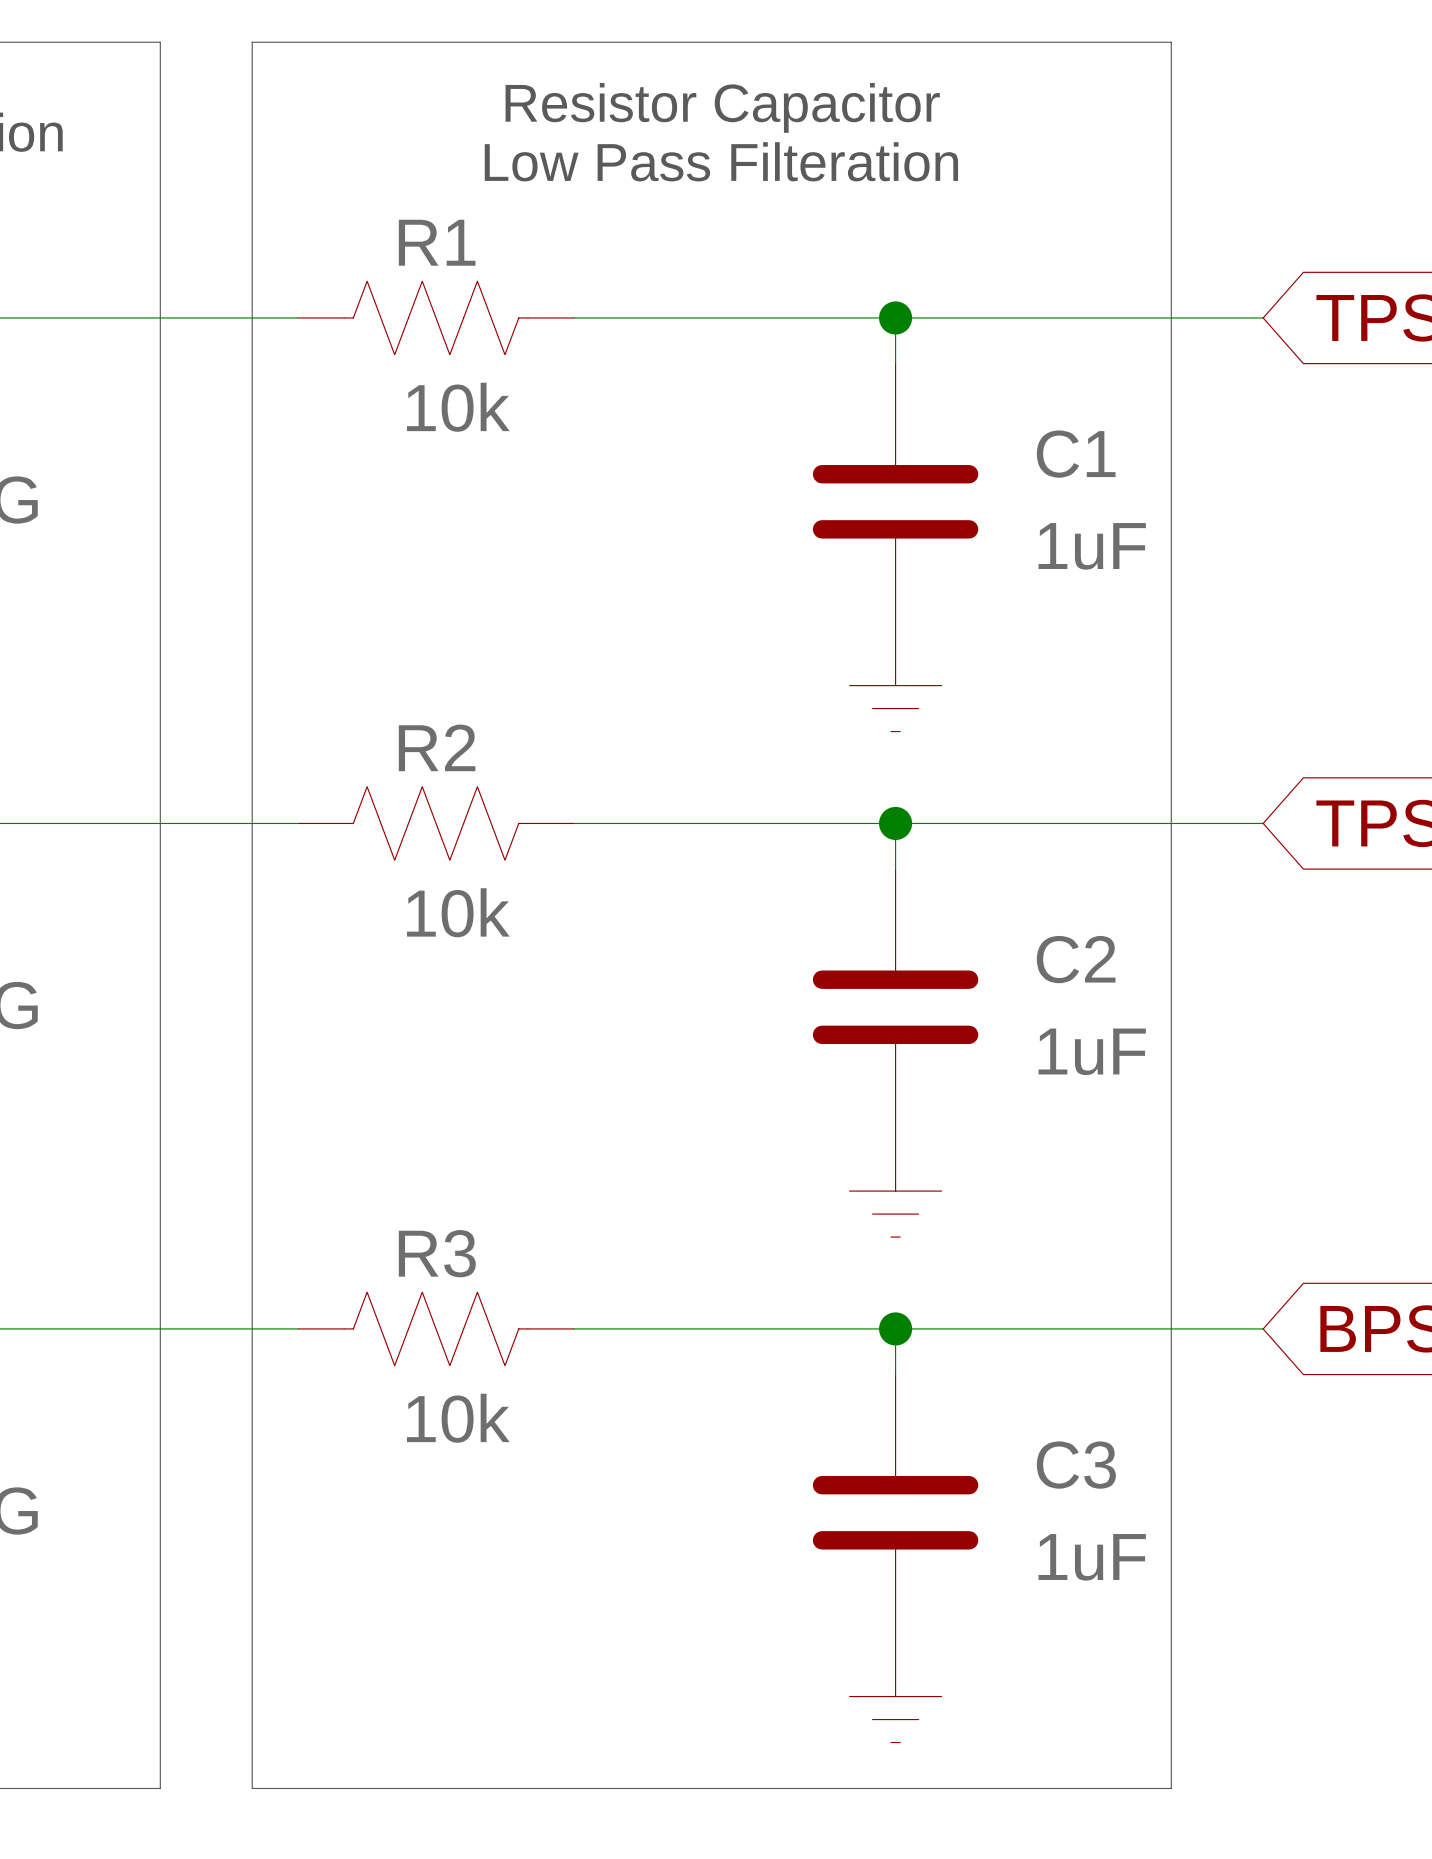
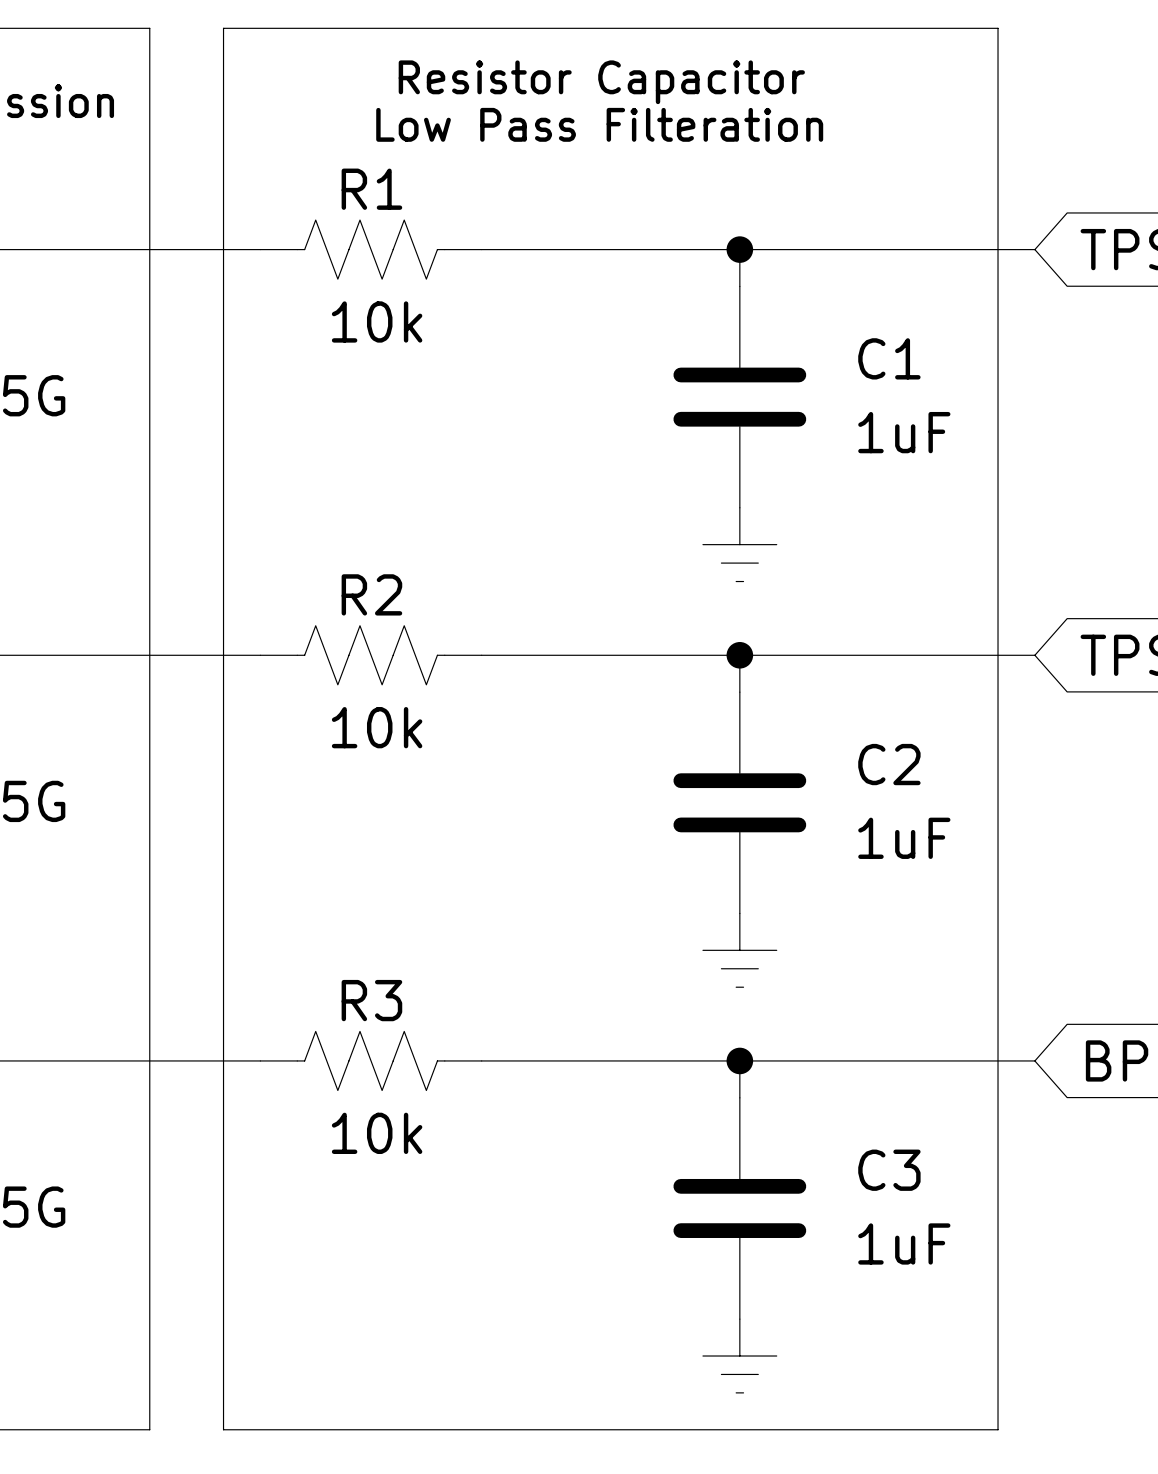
line: (1171, 42) (1171, 1788) -> (961, 28) (998, 28) (998, 1429) (961, 1429)

